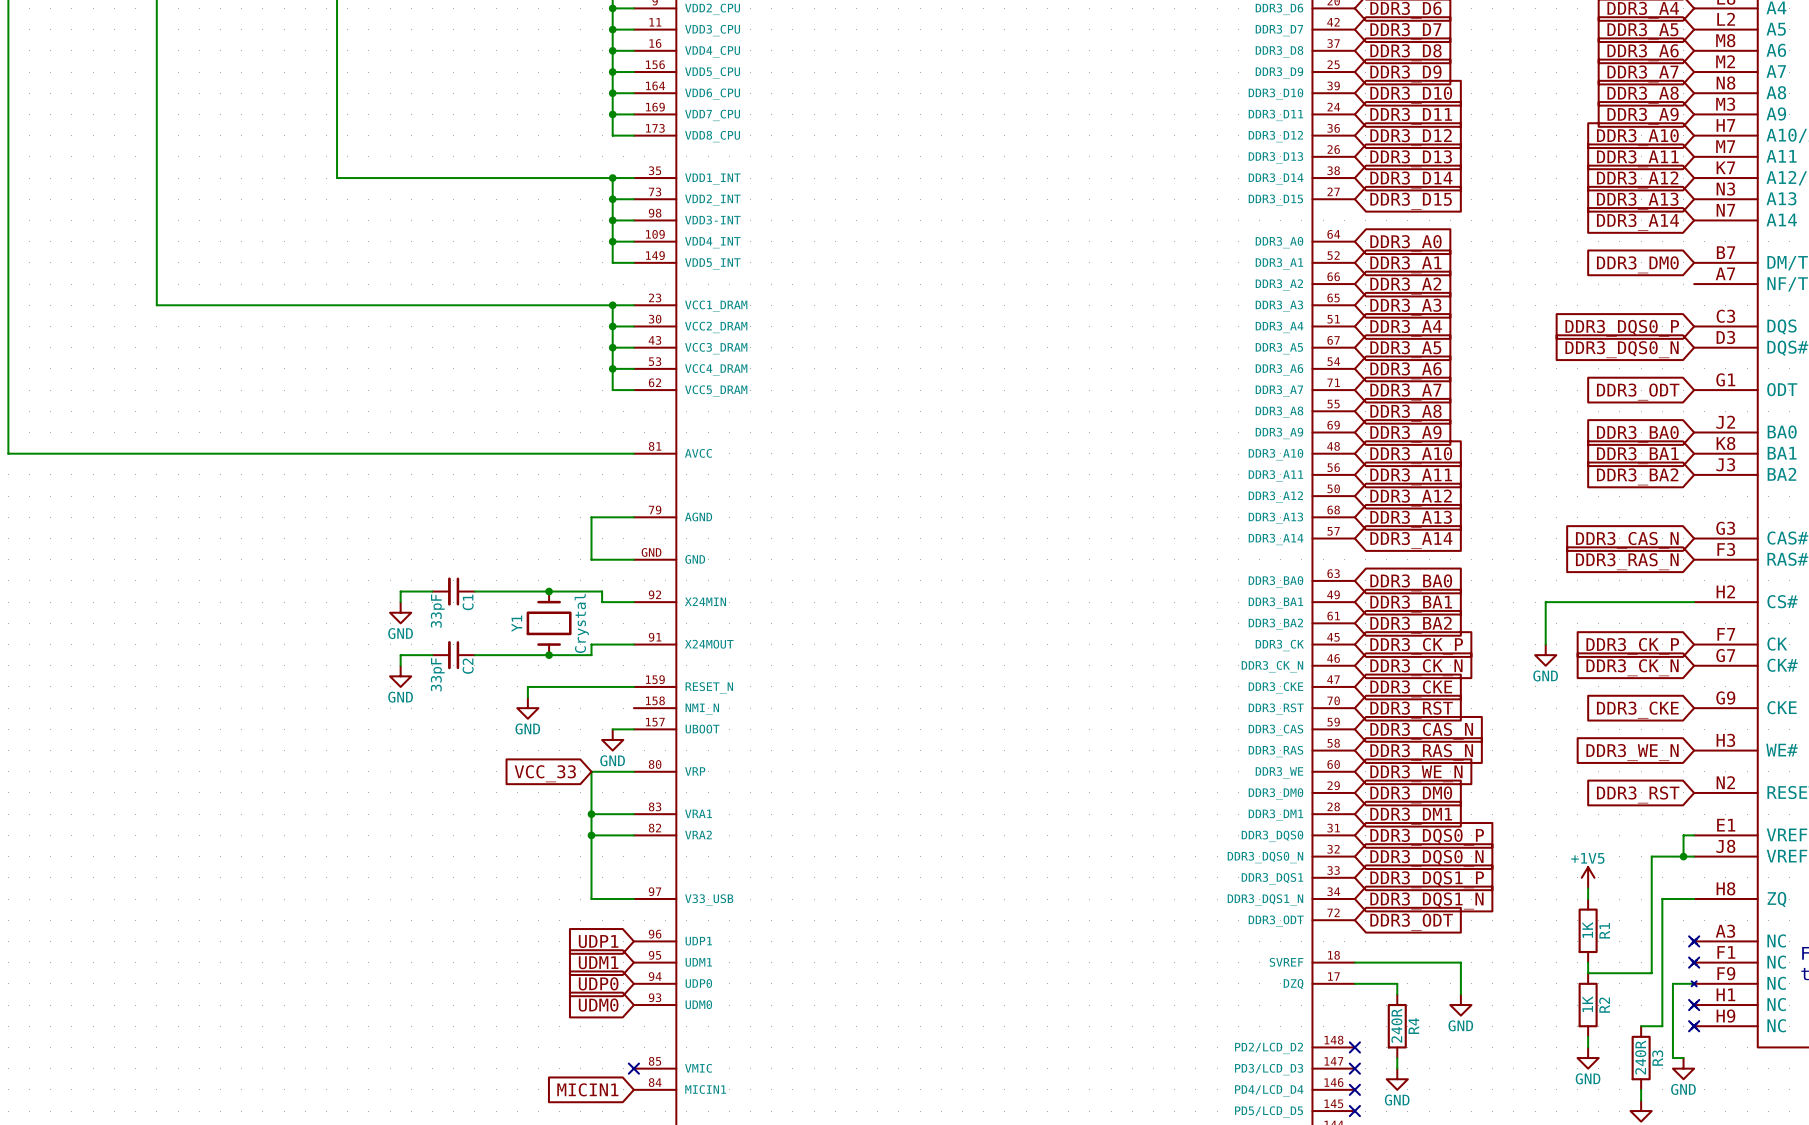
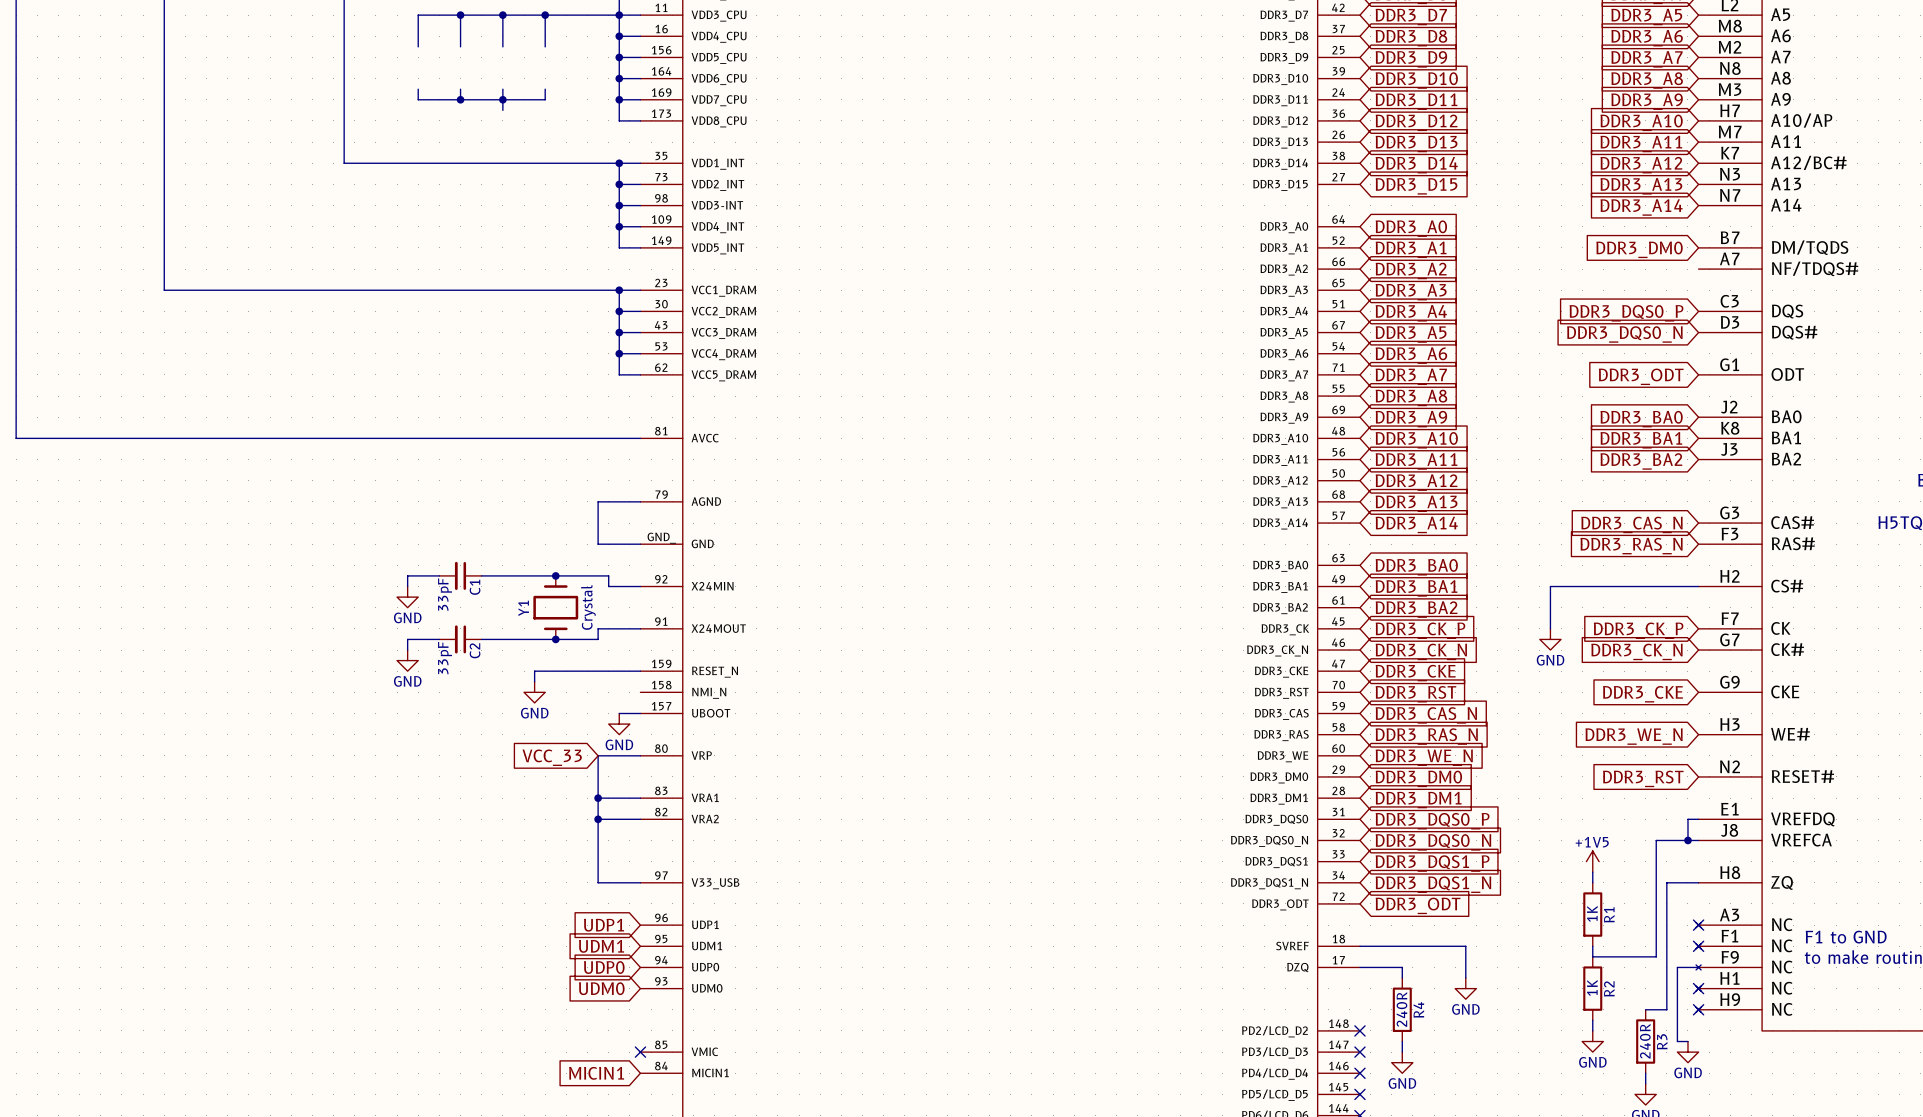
wire: none -> (460, 15) (460, 46)
junction: none -> (460, 15)
wire: none -> (502, 15) (502, 46)
junction: none -> (502, 15)
wire: none -> (545, 15) (545, 46)
junction: none -> (545, 15)
wire: none -> (619, 15) (418, 15) (418, 46)
wire: none -> (418, 89) (418, 99) (545, 99) (545, 89)
wire: none -> (460, 89) (460, 99)
wire: none -> (502, 89) (502, 110)
junction: none -> (460, 99)
junction: none -> (502, 99)

